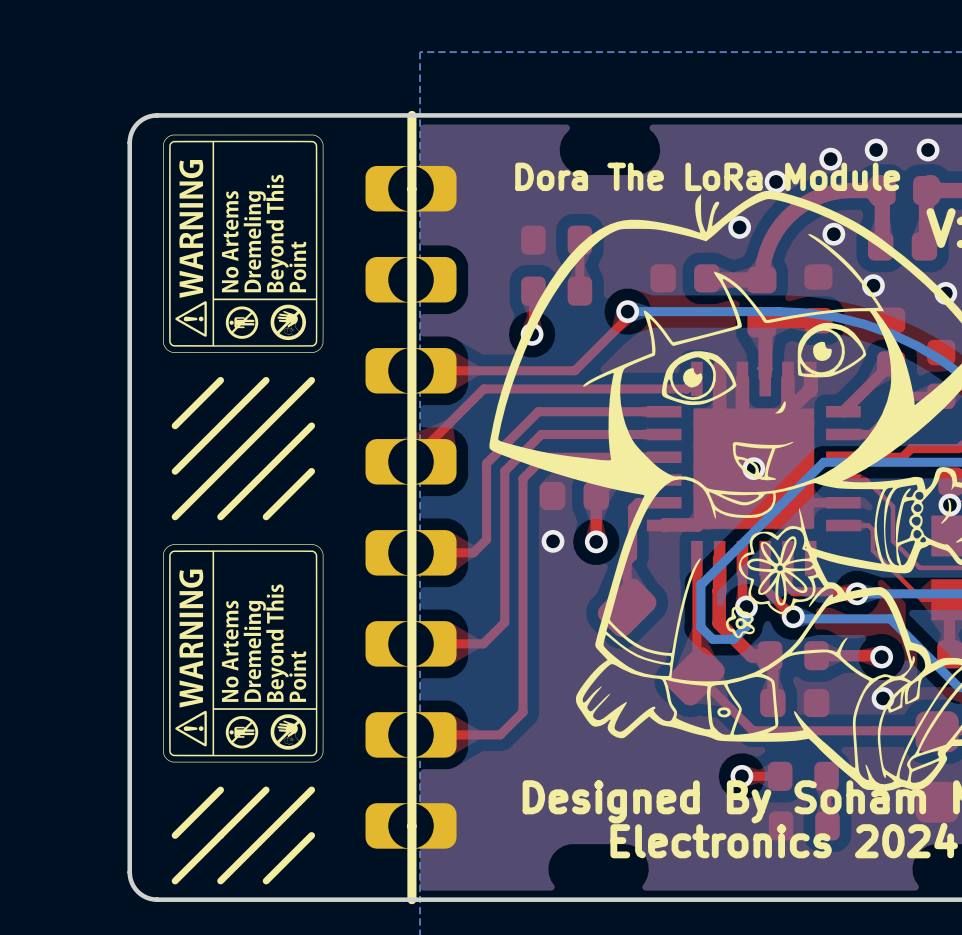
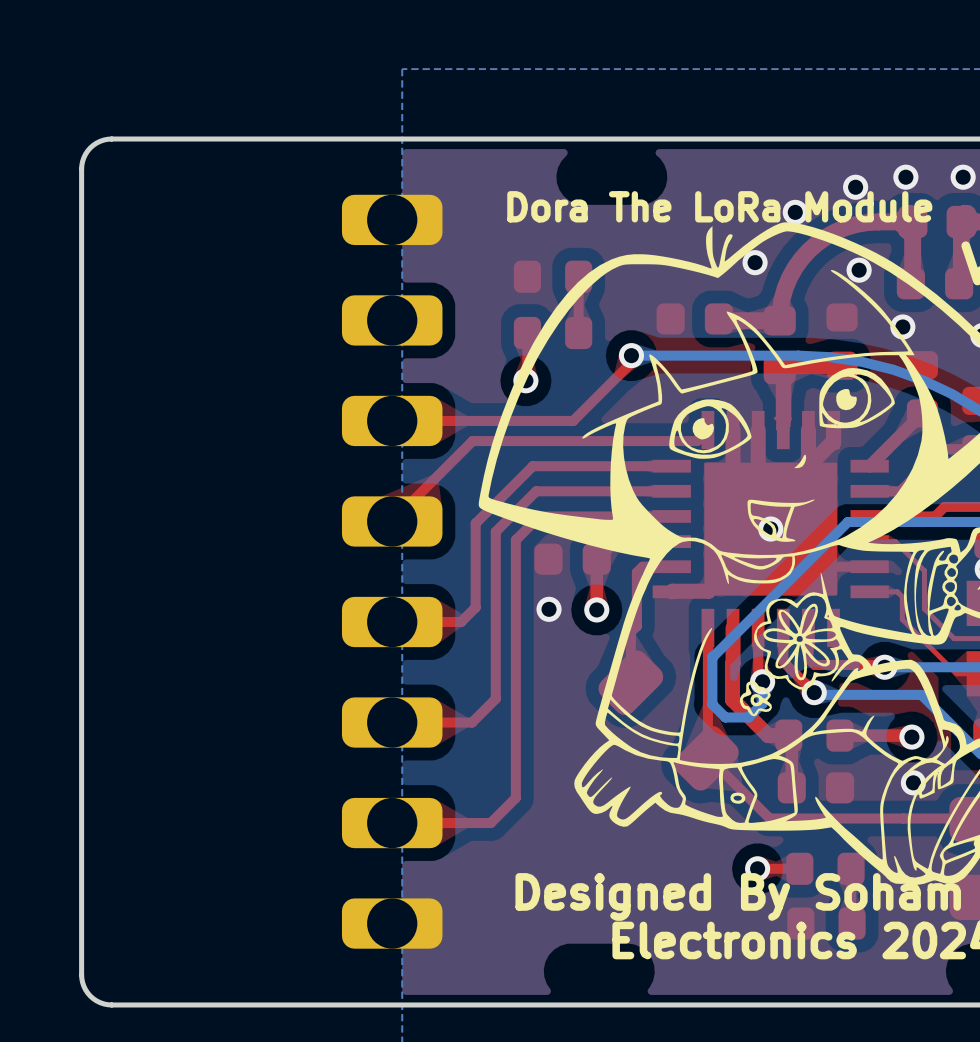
line: (411, 115) (411, 899) -> none
drawing: [162, 134, 324, 353] -> none
line: (220, 380) (175, 425) -> none
line: (266, 380) (175, 471) -> none
line: (311, 380) (175, 516) -> none
line: (311, 425) (220, 516) -> none
line: (311, 471) (266, 516) -> none
drawing: [162, 544, 324, 763] -> none
line: (220, 789) (175, 835) -> none
line: (266, 789) (175, 881) -> none
line: (311, 789) (220, 881) -> none
line: (311, 835) (266, 881) -> none

